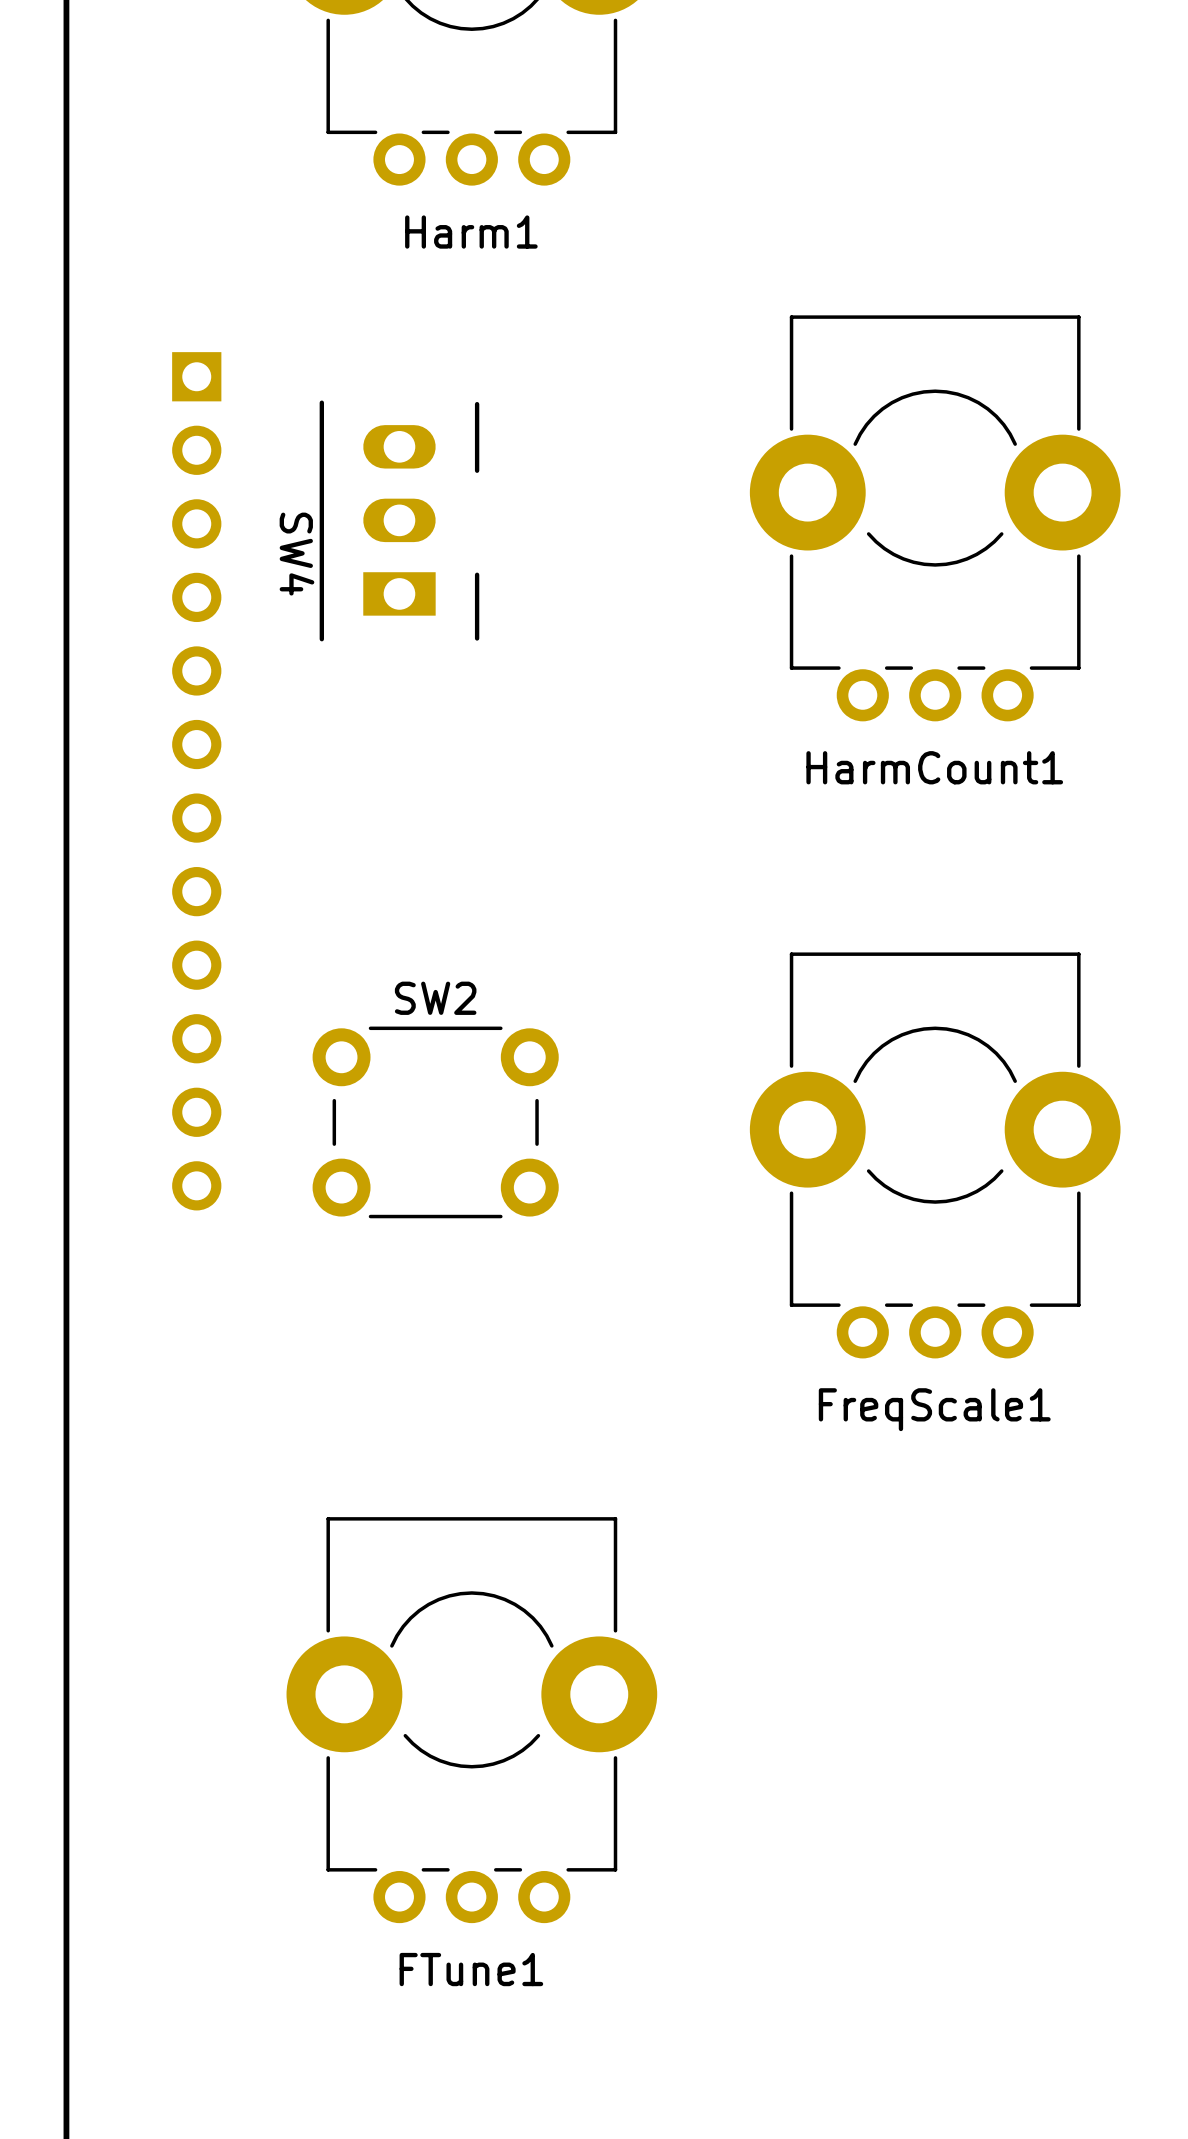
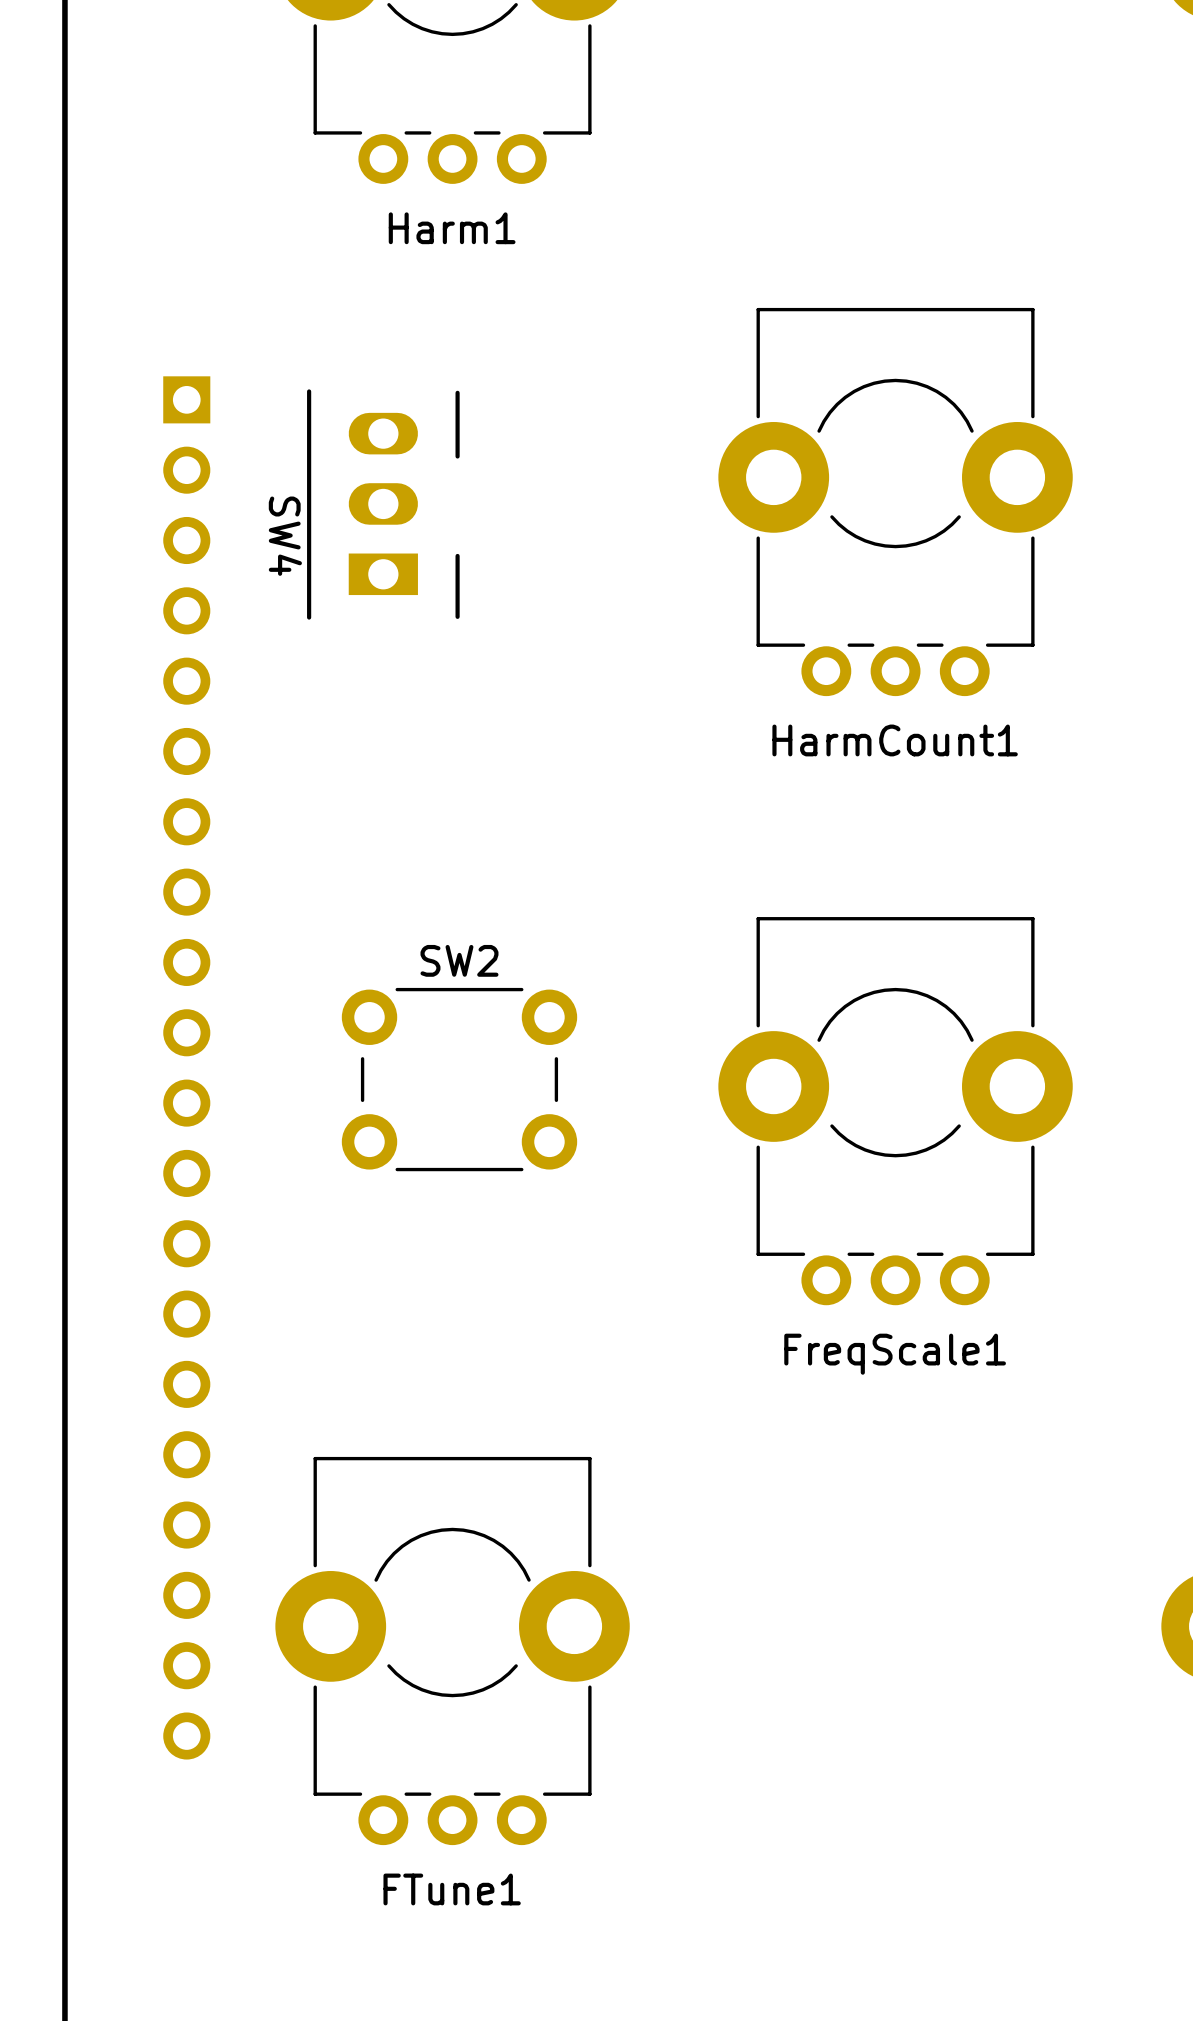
part: (196, 781) -> none
part: none -> (186, 1067)
SW2 position: (435, 1122) -> (459, 1079)

